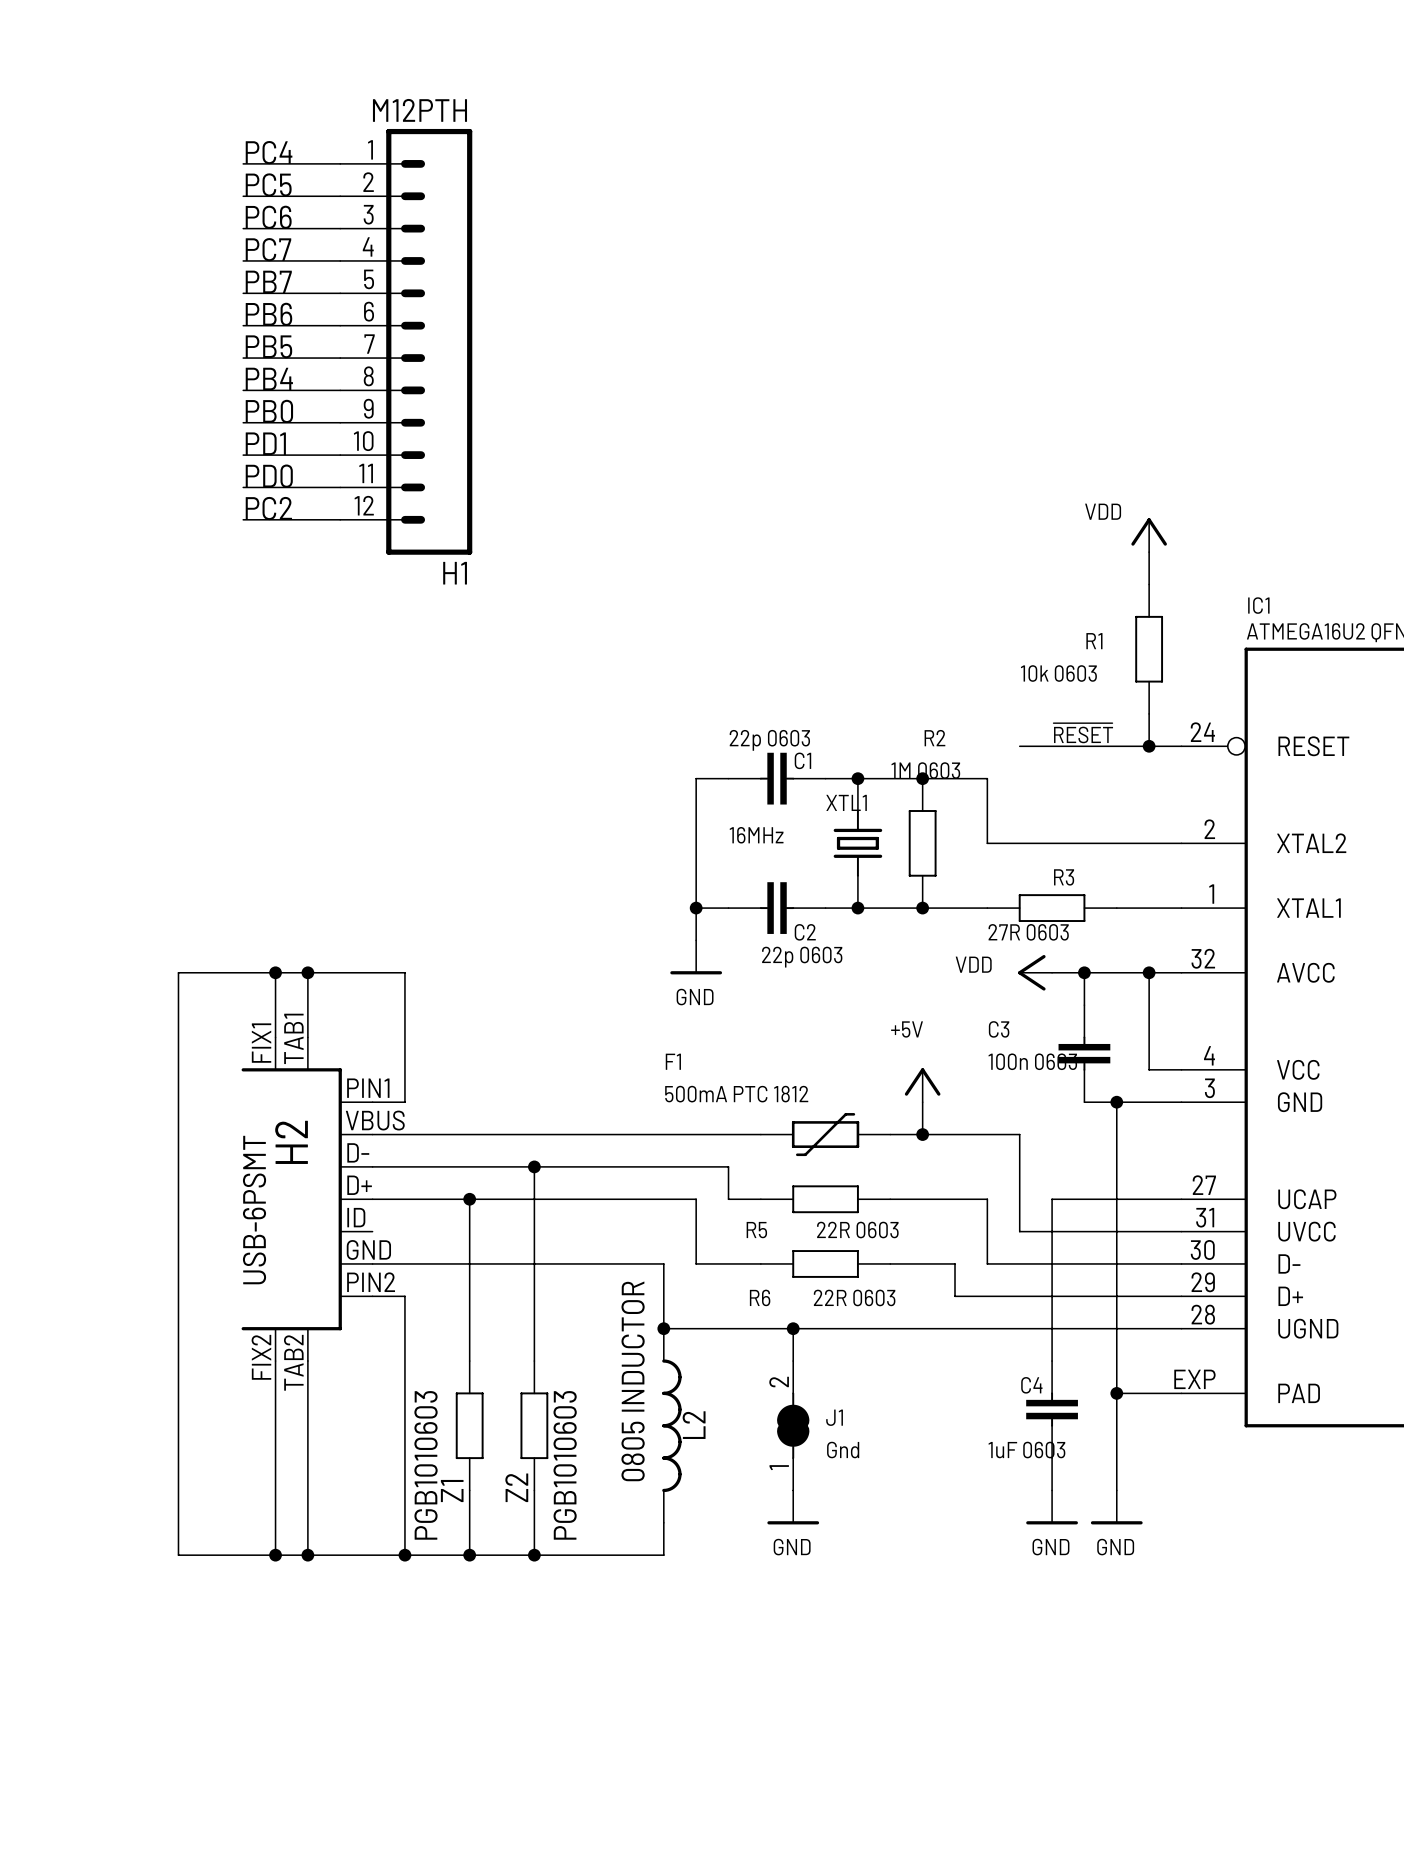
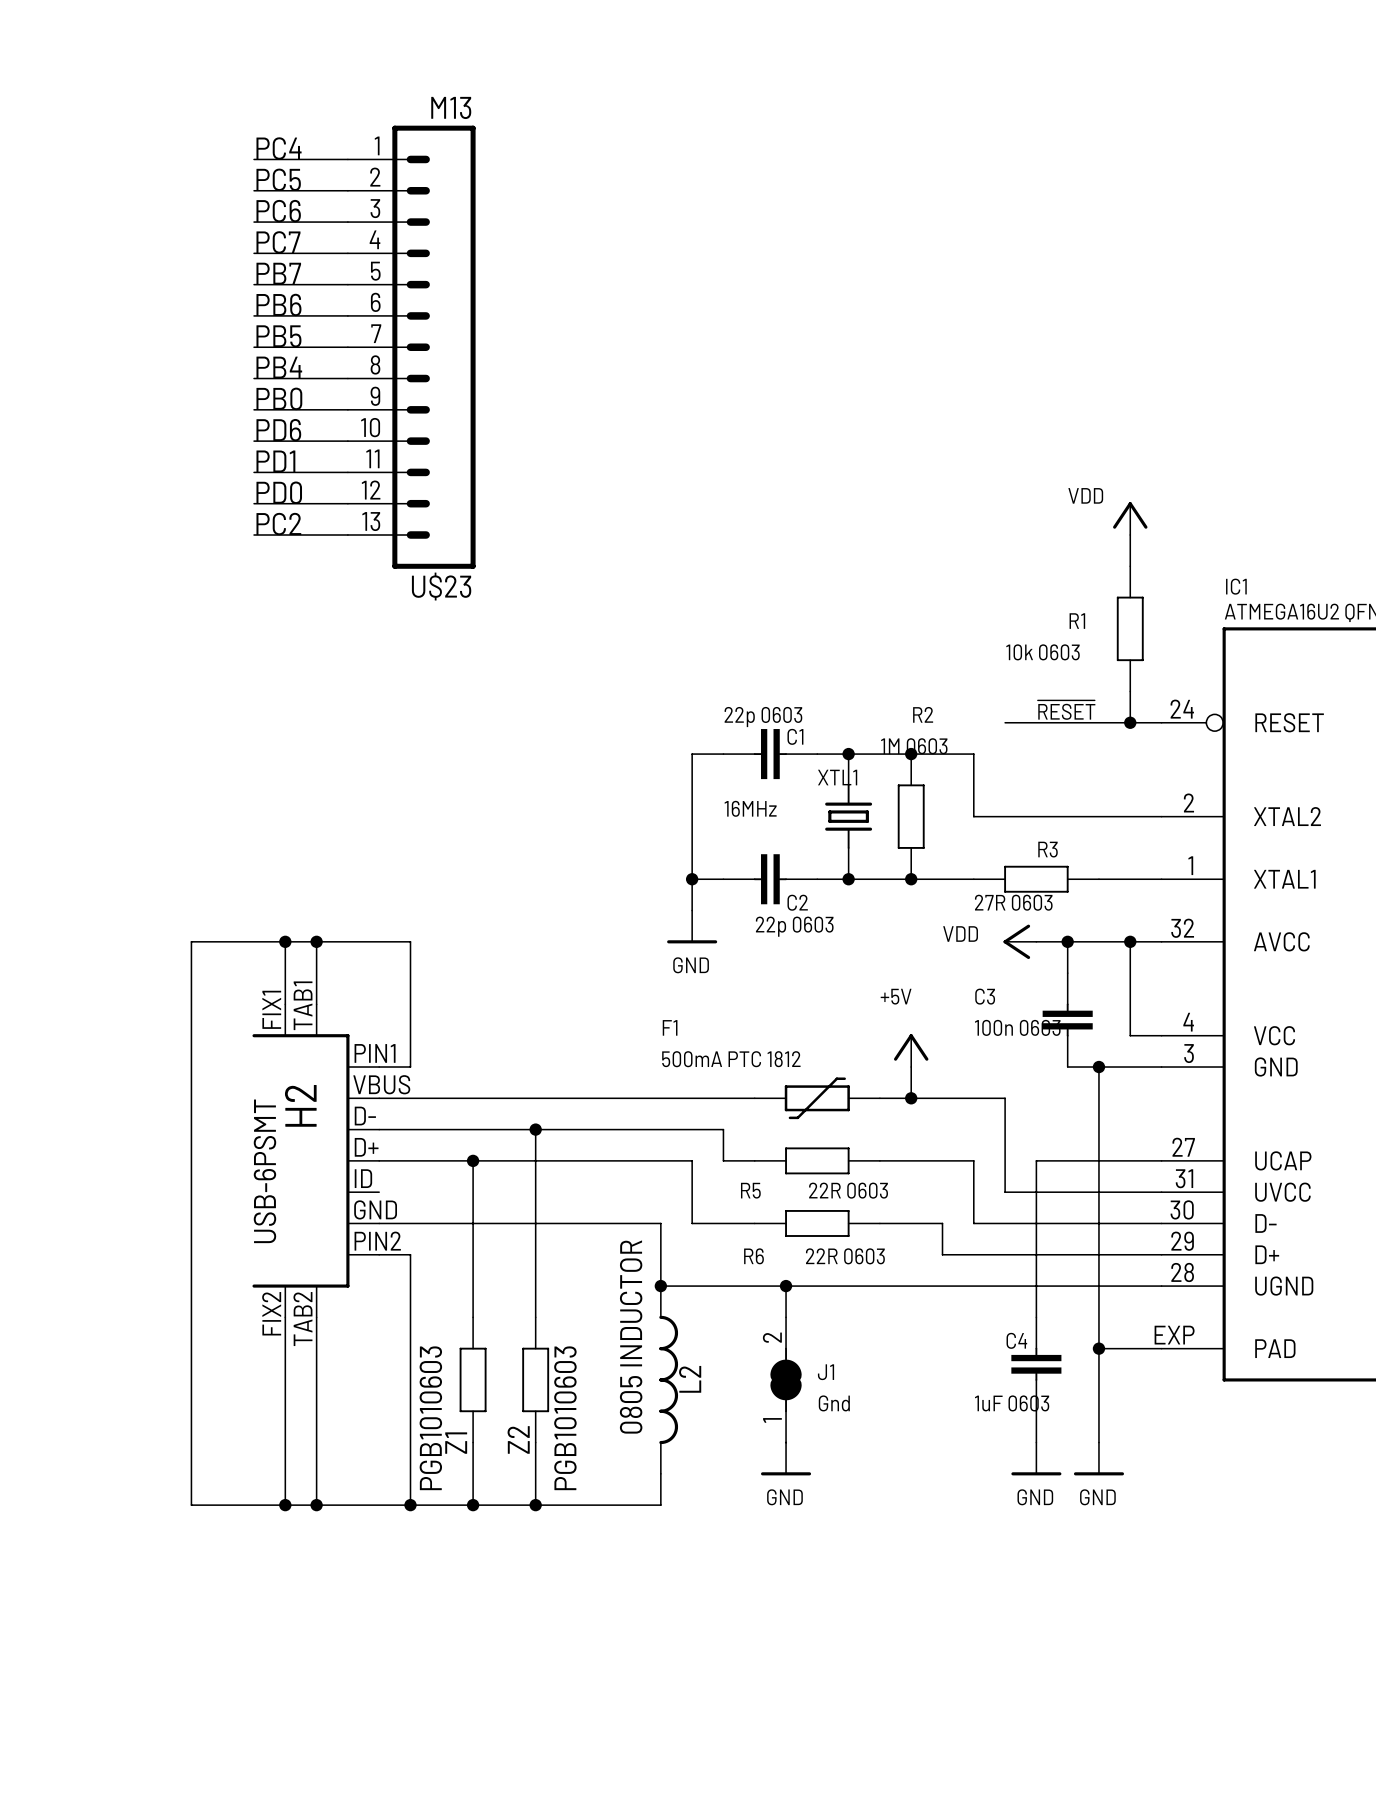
H1: M12PTH (406, 341) -> none
U$23: none -> M13 (411, 347)
label: PD1 (265, 443) -> PD6 (278, 430)
label: PD0 (269, 476) -> PD1 (275, 461)
label: PC2 (268, 508) -> PD0 (279, 492)
label: none -> PC2 (278, 524)
wire: none -> (254, 535) (347, 535)

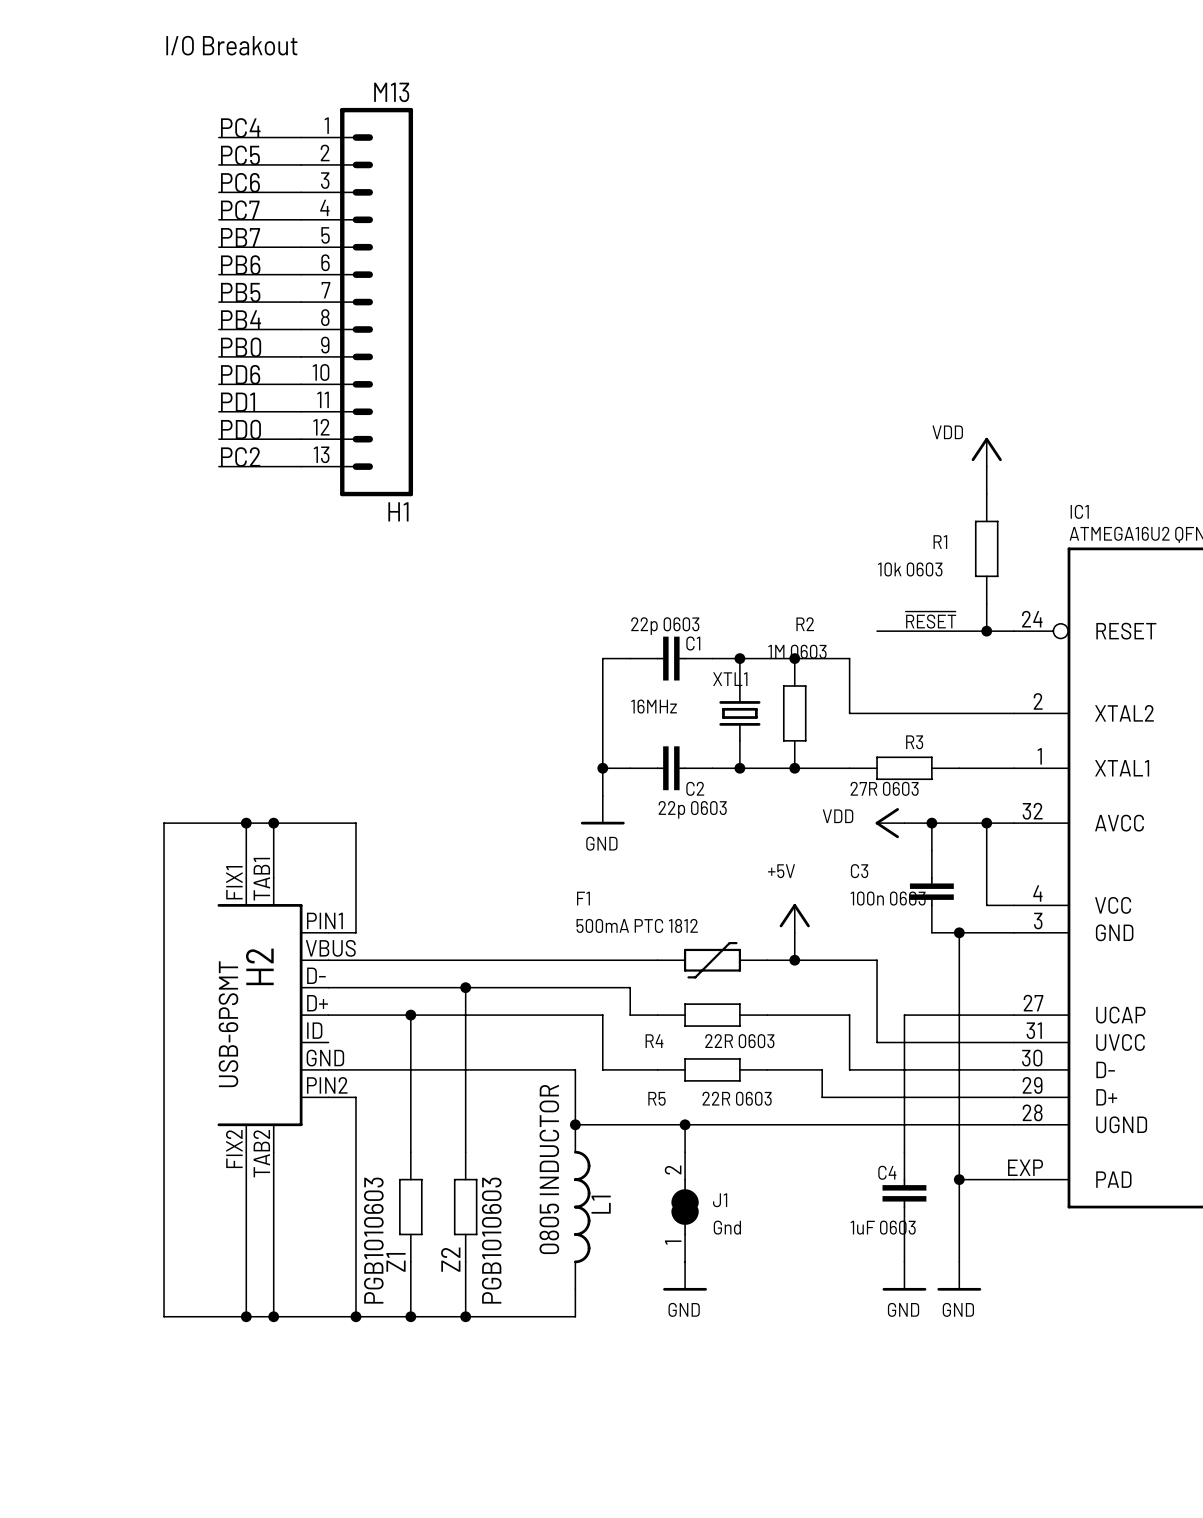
text: none -> I/O Breakout (231, 45)
U$23 name: U$23 (441, 586) -> H1 (398, 511)
R5 name: R5 (750, 1190) -> R4 (654, 1041)
R6 name: R6 (754, 1256) -> R5 (656, 1098)
L2 name: L2 (690, 1379) -> L1 (601, 1204)

